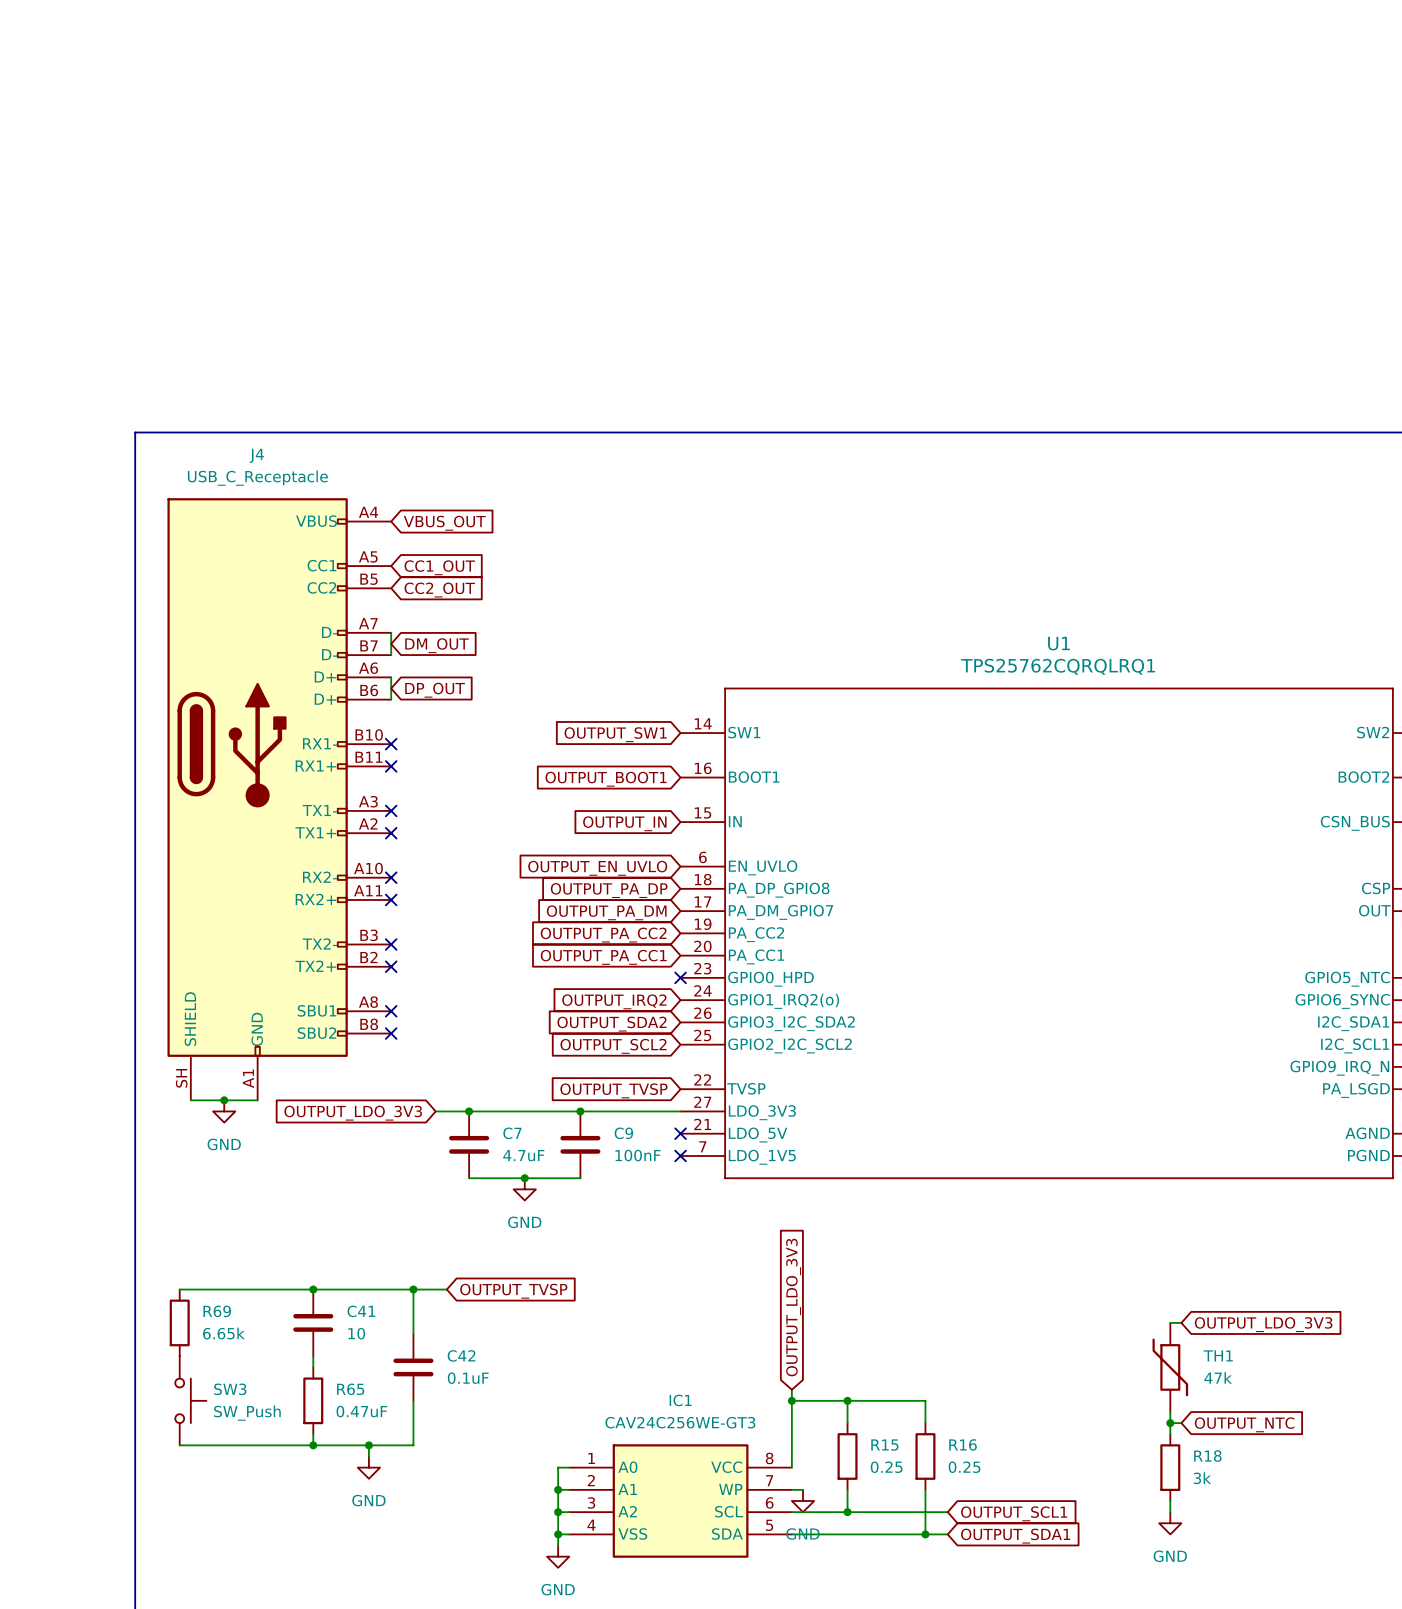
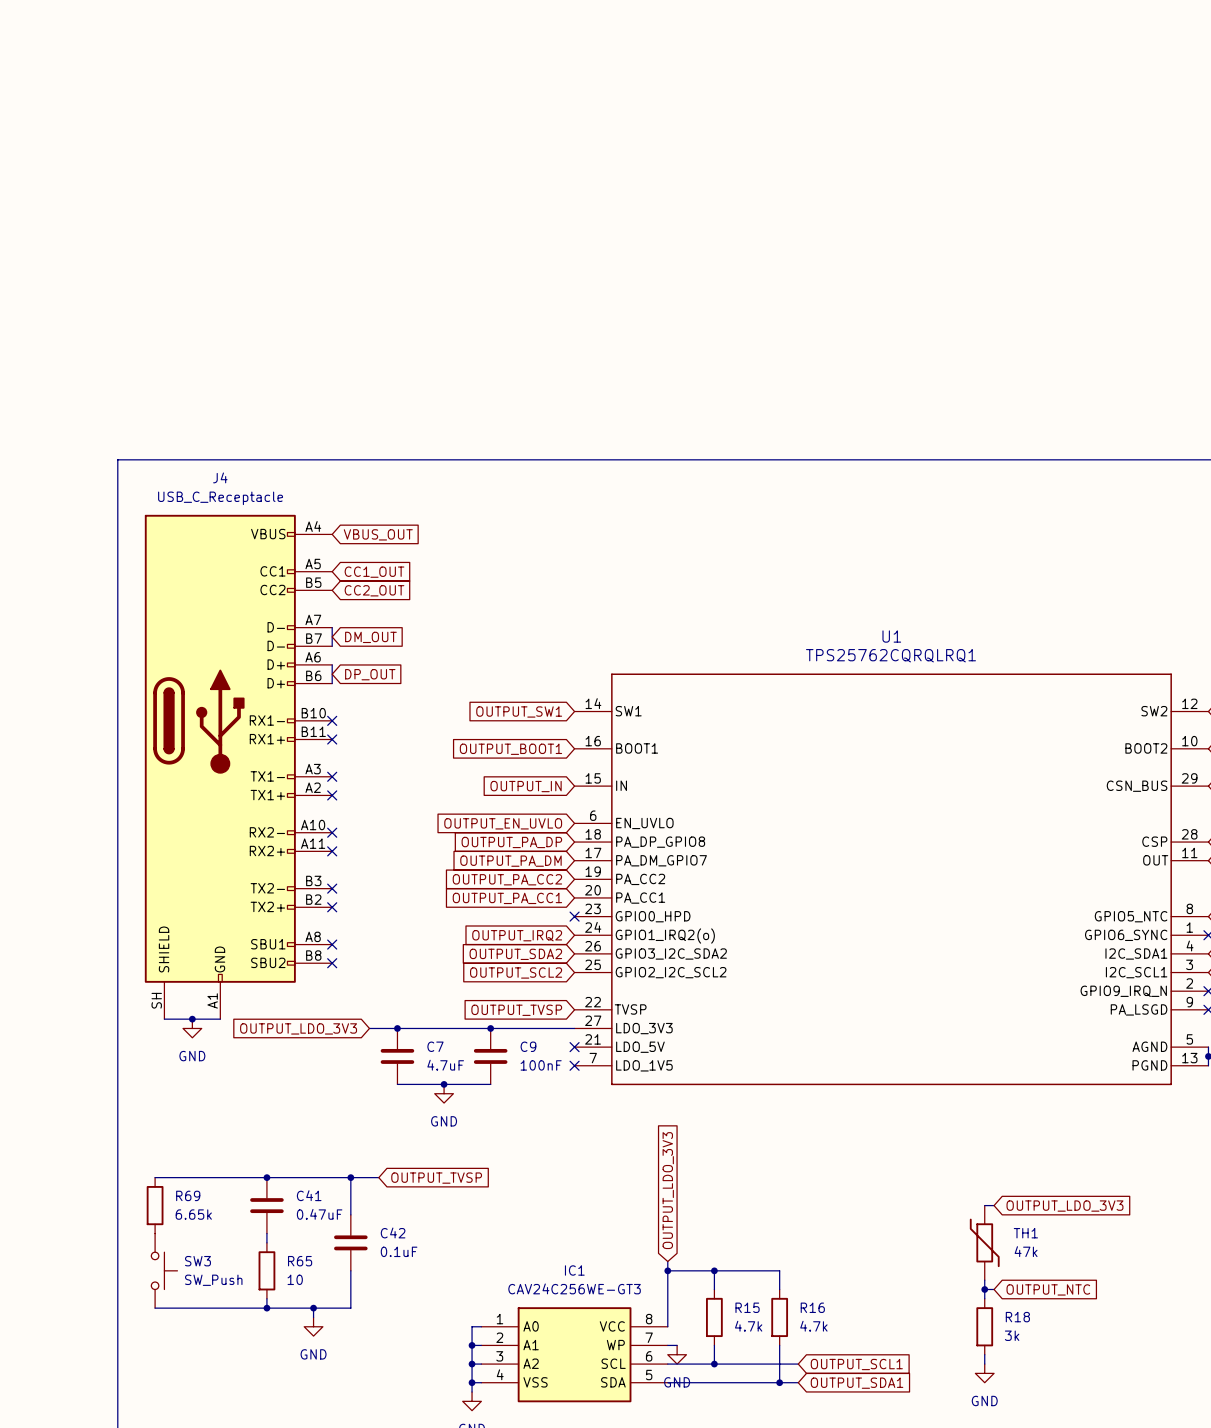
C41 value: 10 (356, 1333) -> 0.47uF (319, 1214)
R65 value: 0.47uF (361, 1411) -> 10 (295, 1279)
R15 value: 0.25 (886, 1467) -> 4.7k (748, 1326)
R16 value: 0.25 (964, 1467) -> 4.7k (813, 1326)

